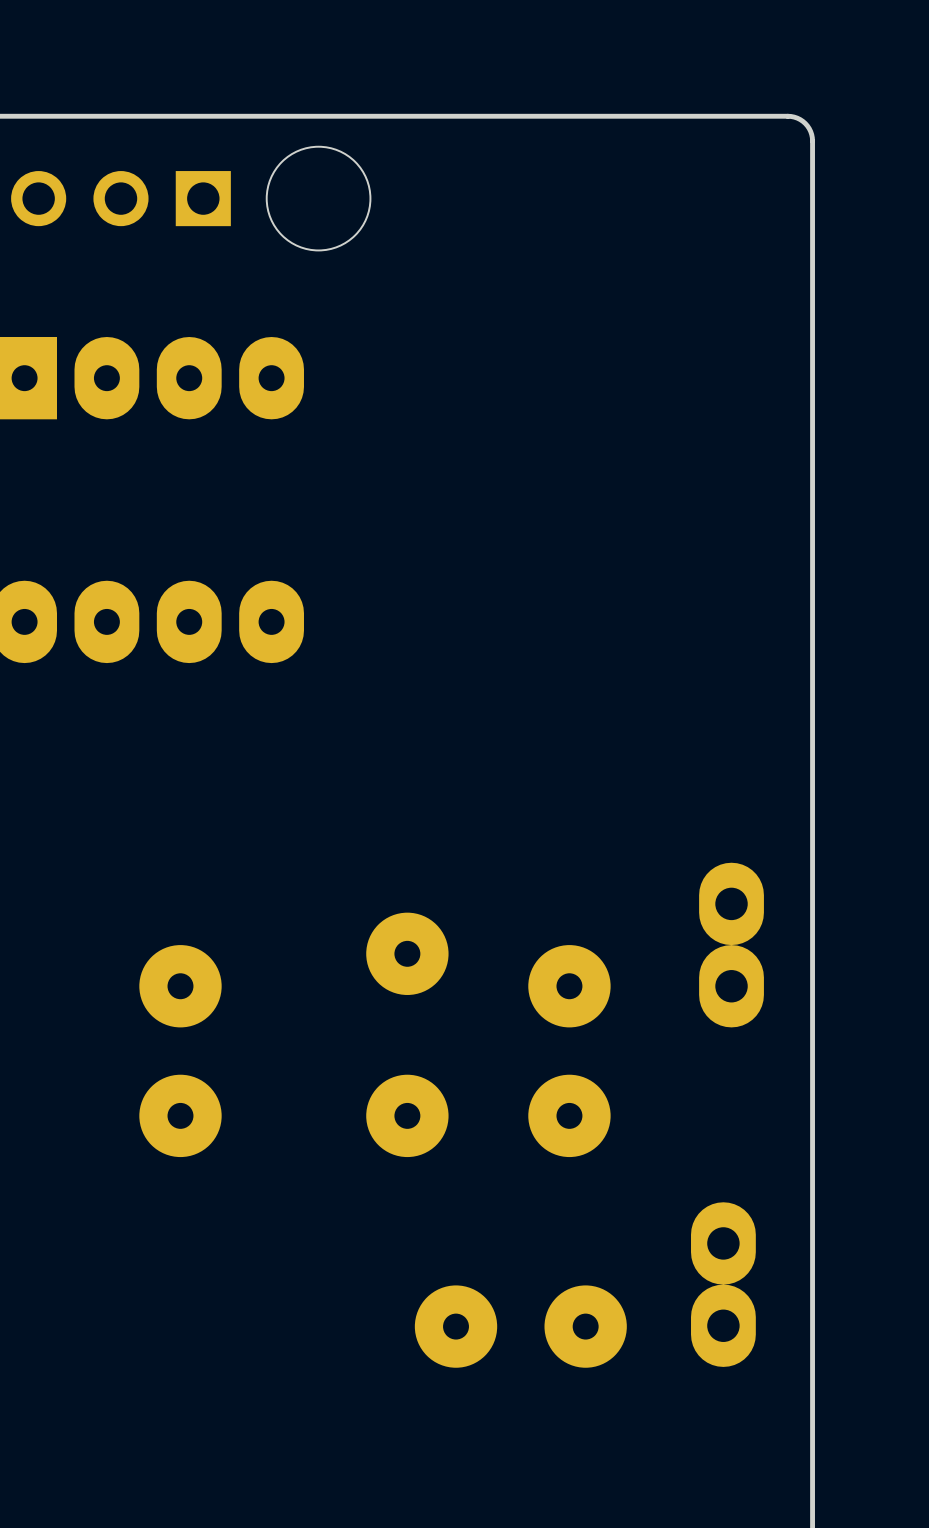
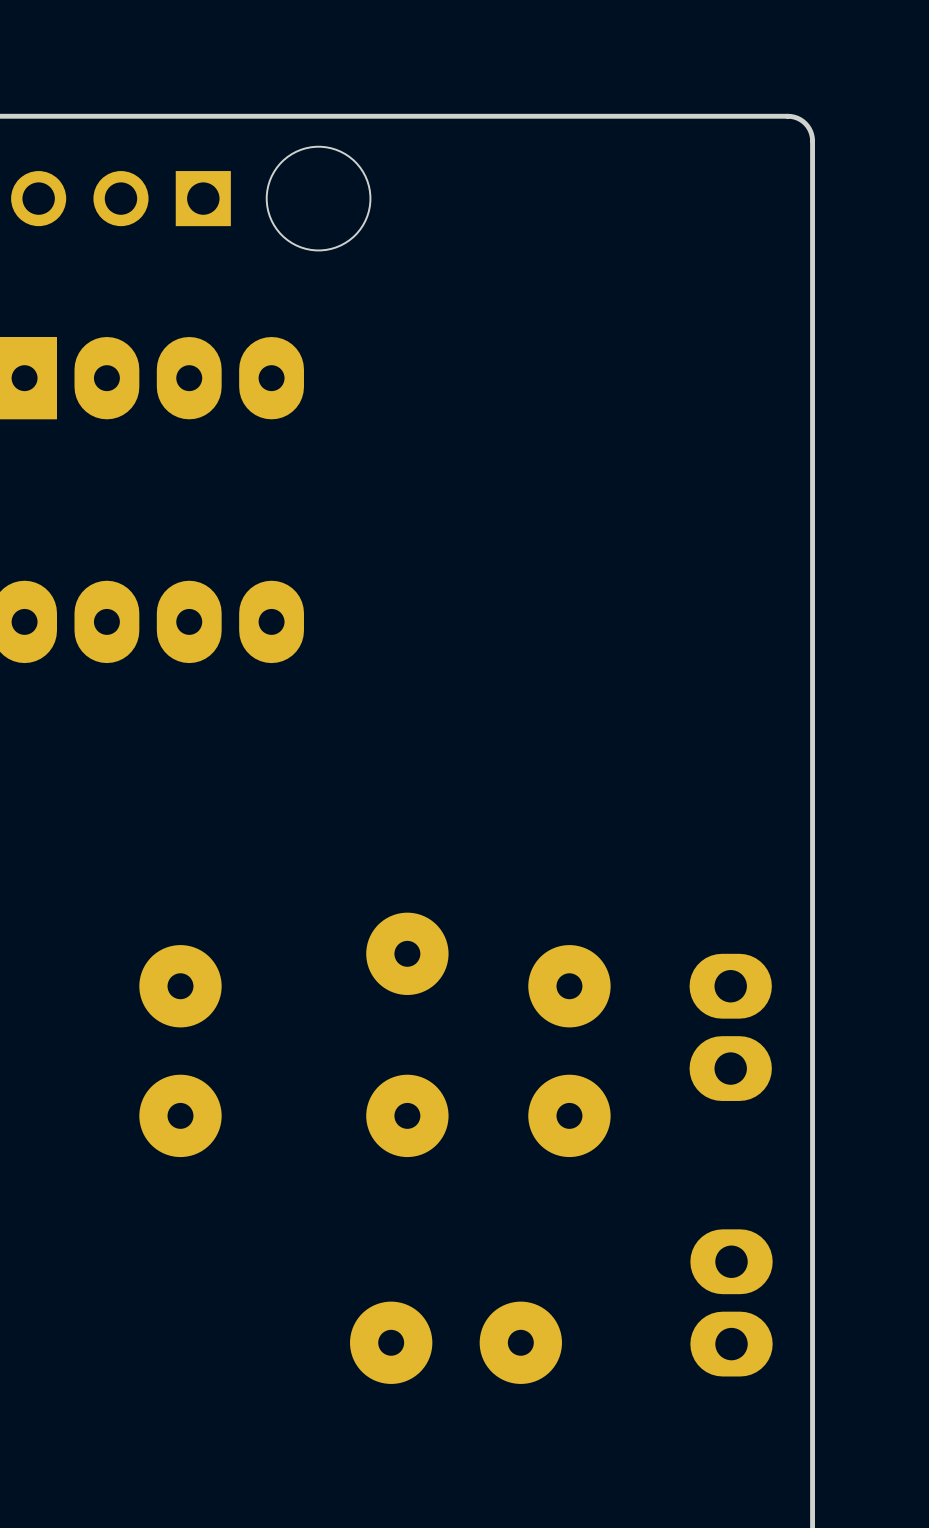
part: (731, 945) -> none
part: none -> (730, 1027)
part footprint: [691, 1202, 756, 1367] -> [690, 1229, 773, 1377]
part position: (520, 1326) -> (456, 1342)

